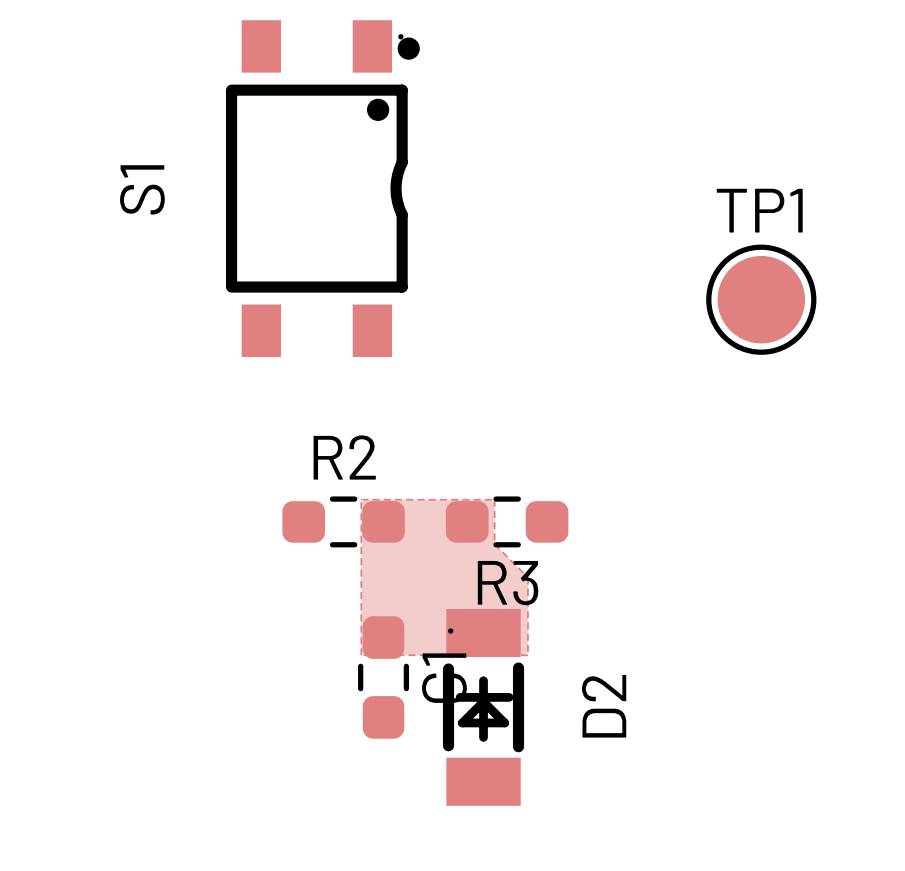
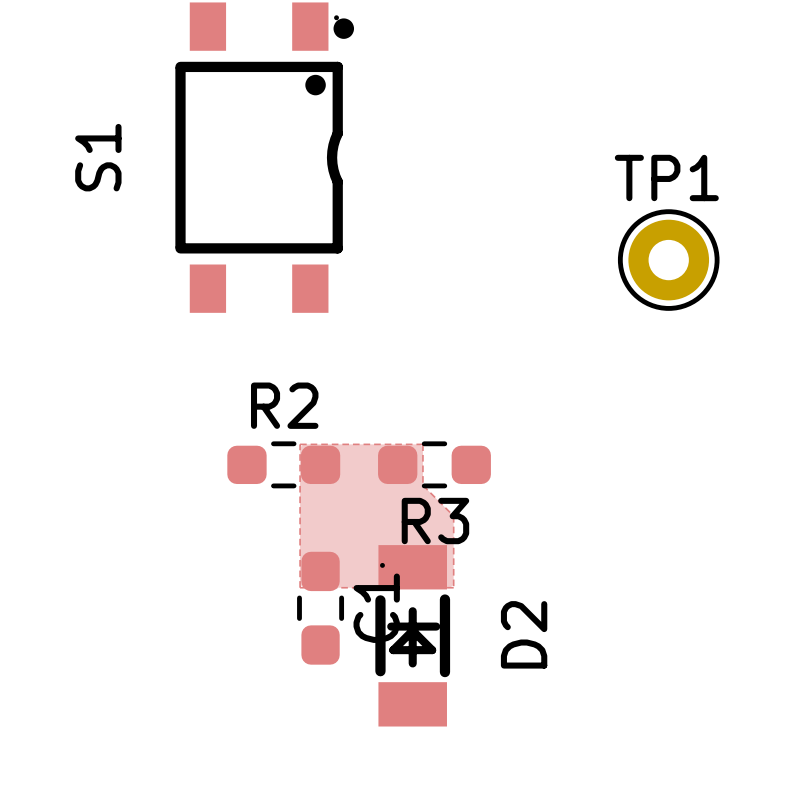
TP1 footprint: [706, 244, 817, 355] -> [617, 209, 720, 311]

